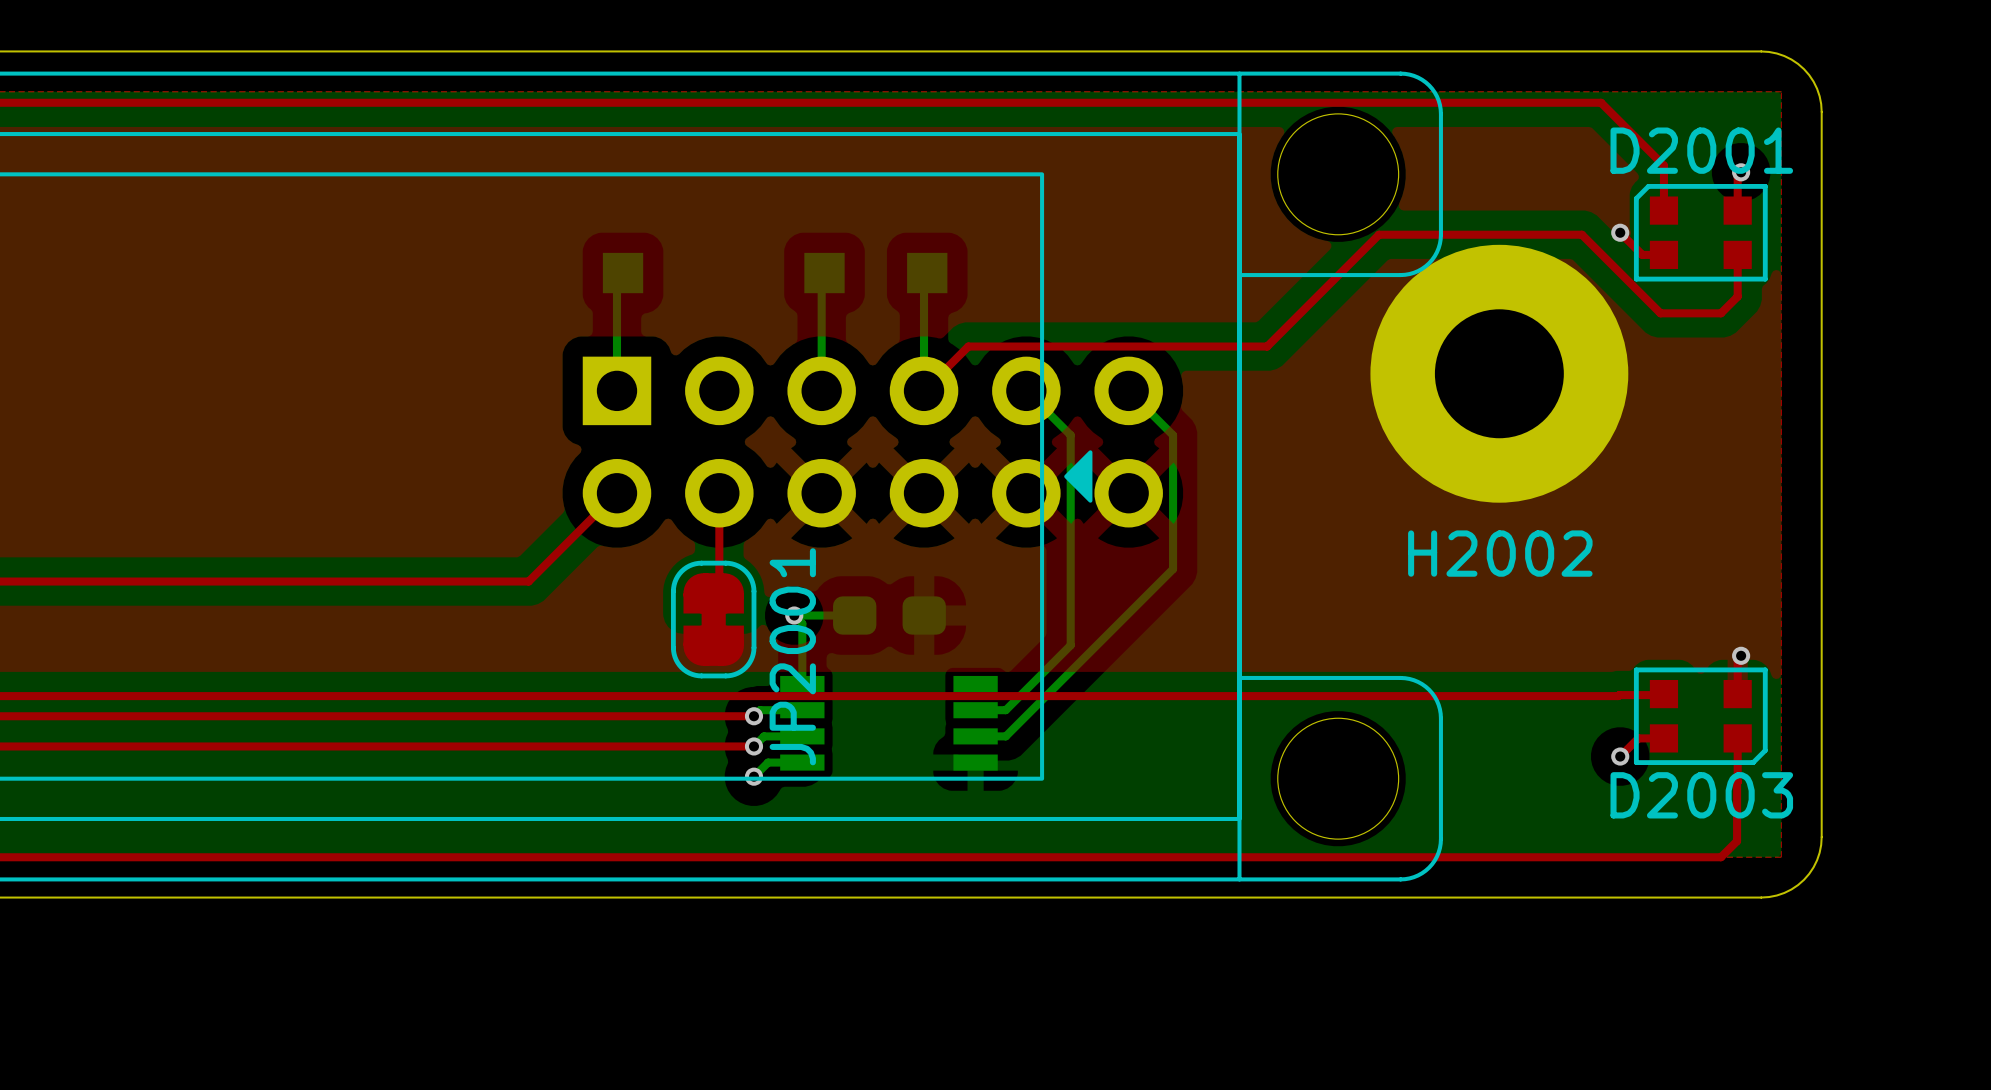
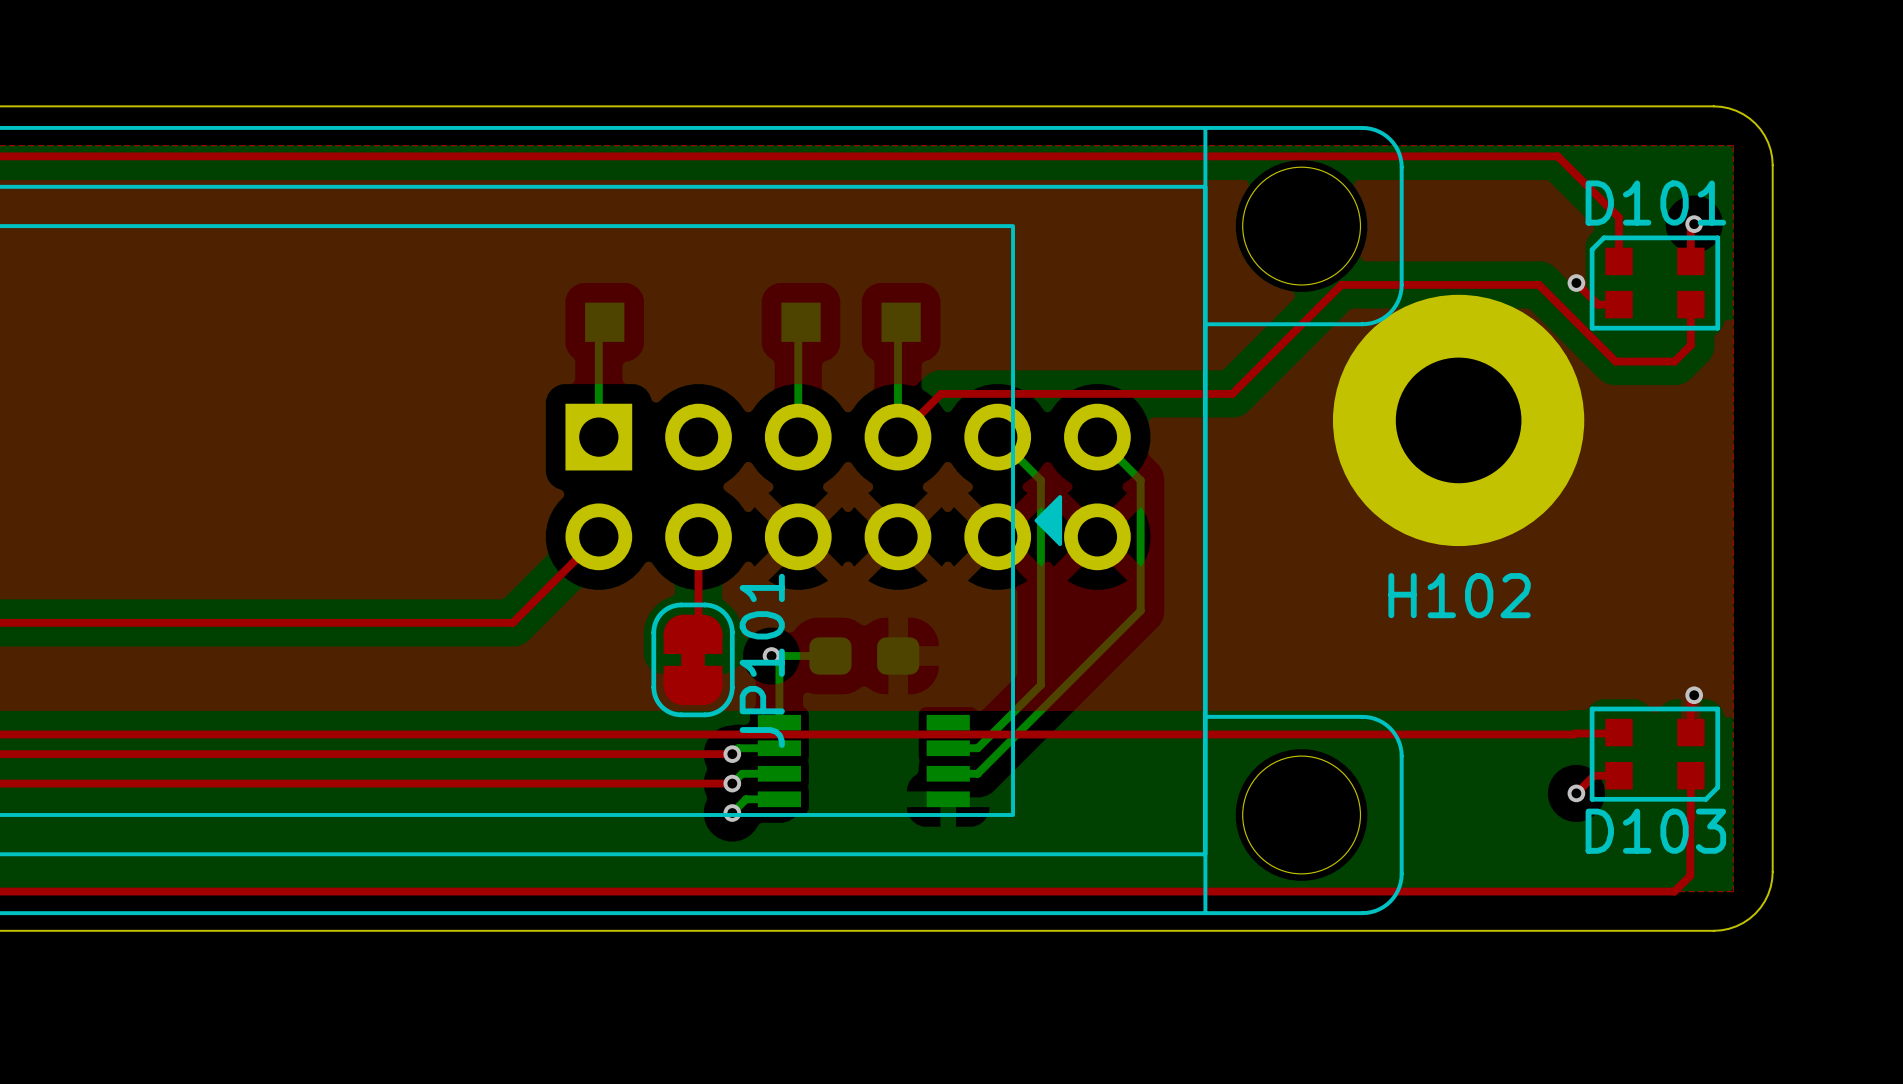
D2001 name: D2001 (1701, 150) -> D101 (1655, 203)
H2002 name: H2002 (1500, 553) -> H102 (1459, 595)
JP2001 name: JP2001 (792, 656) -> JP101 (762, 660)
D2003 name: D2003 (1701, 795) -> D103 (1655, 831)

